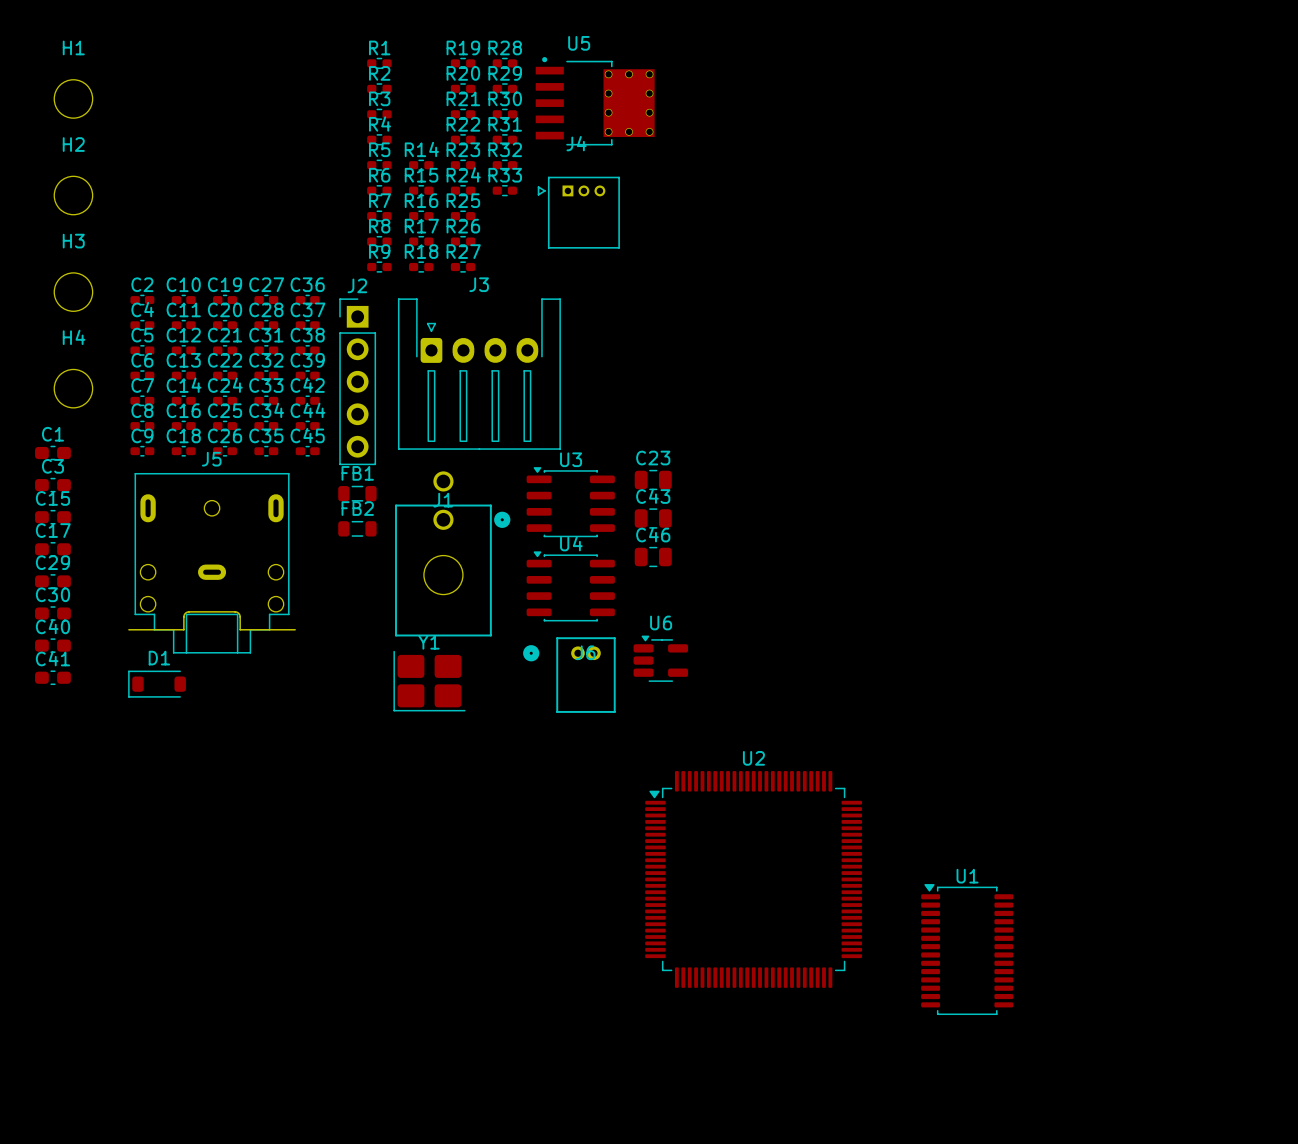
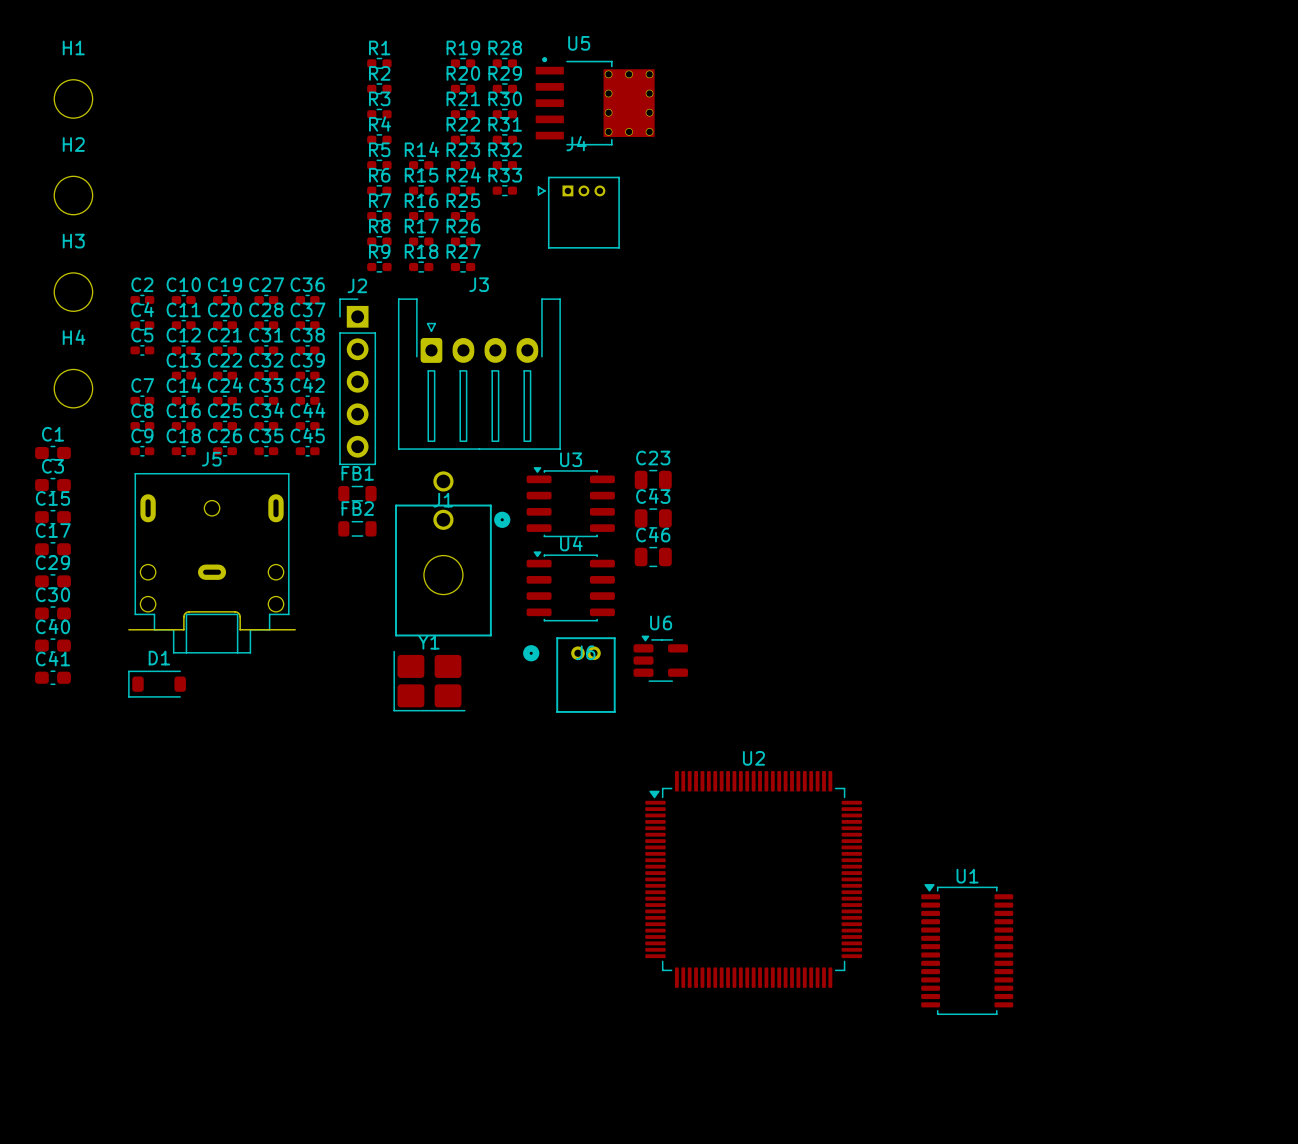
C6: (142, 375) -> none

